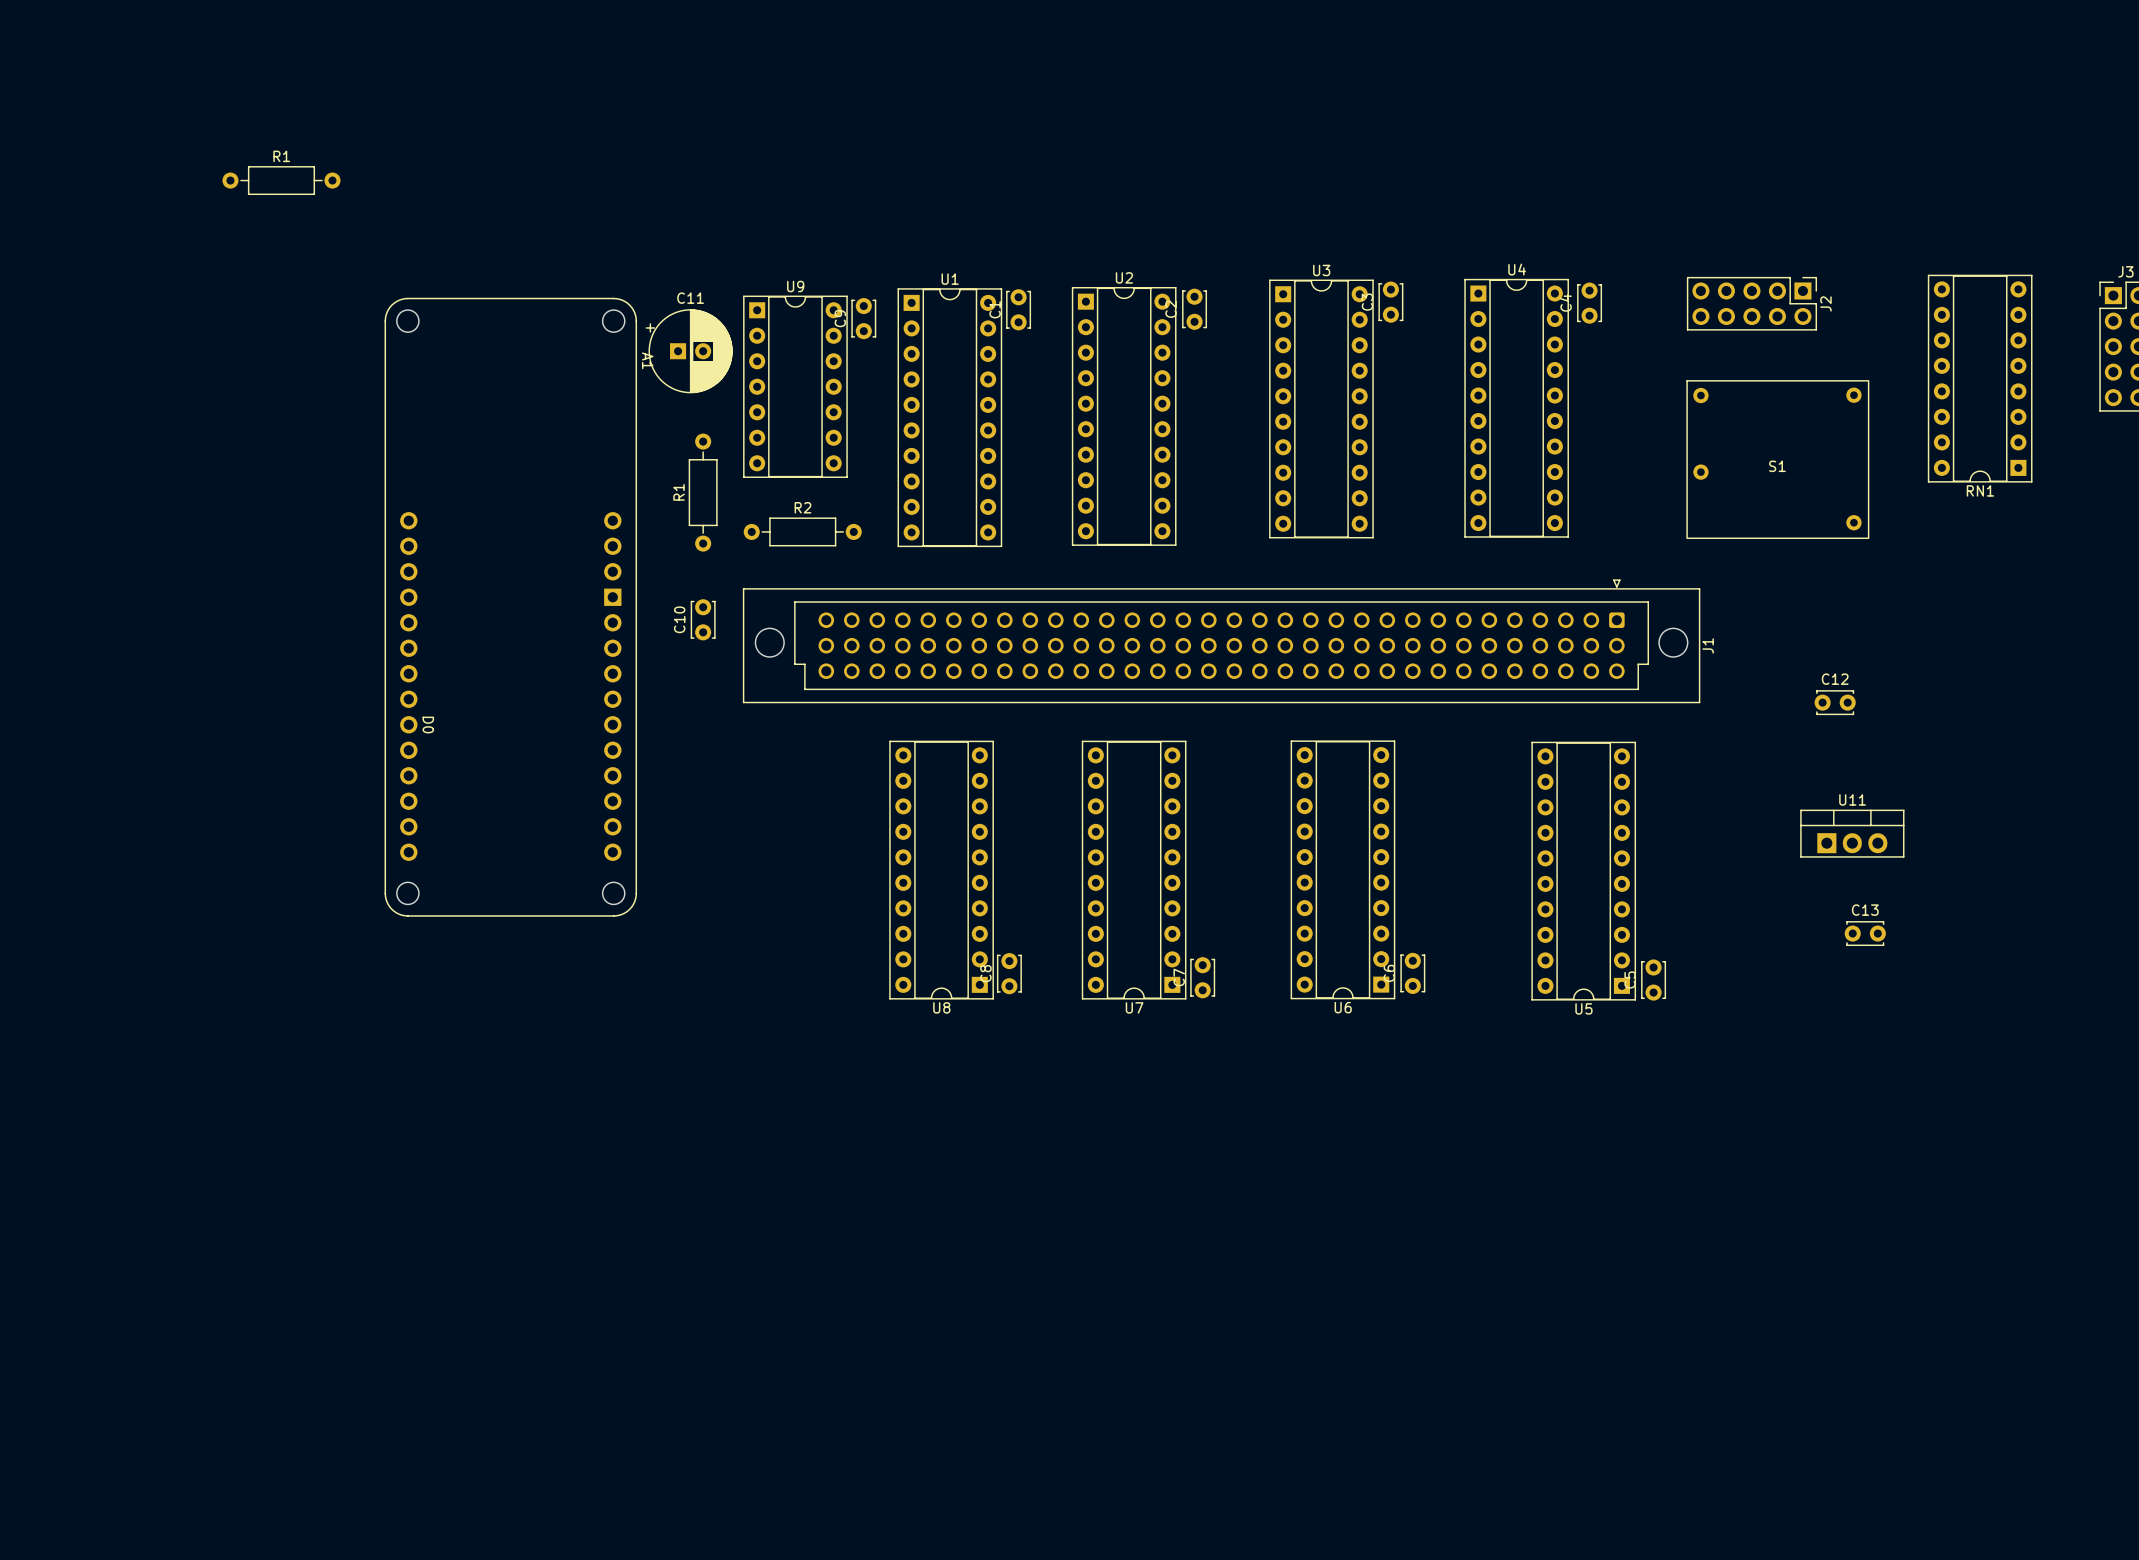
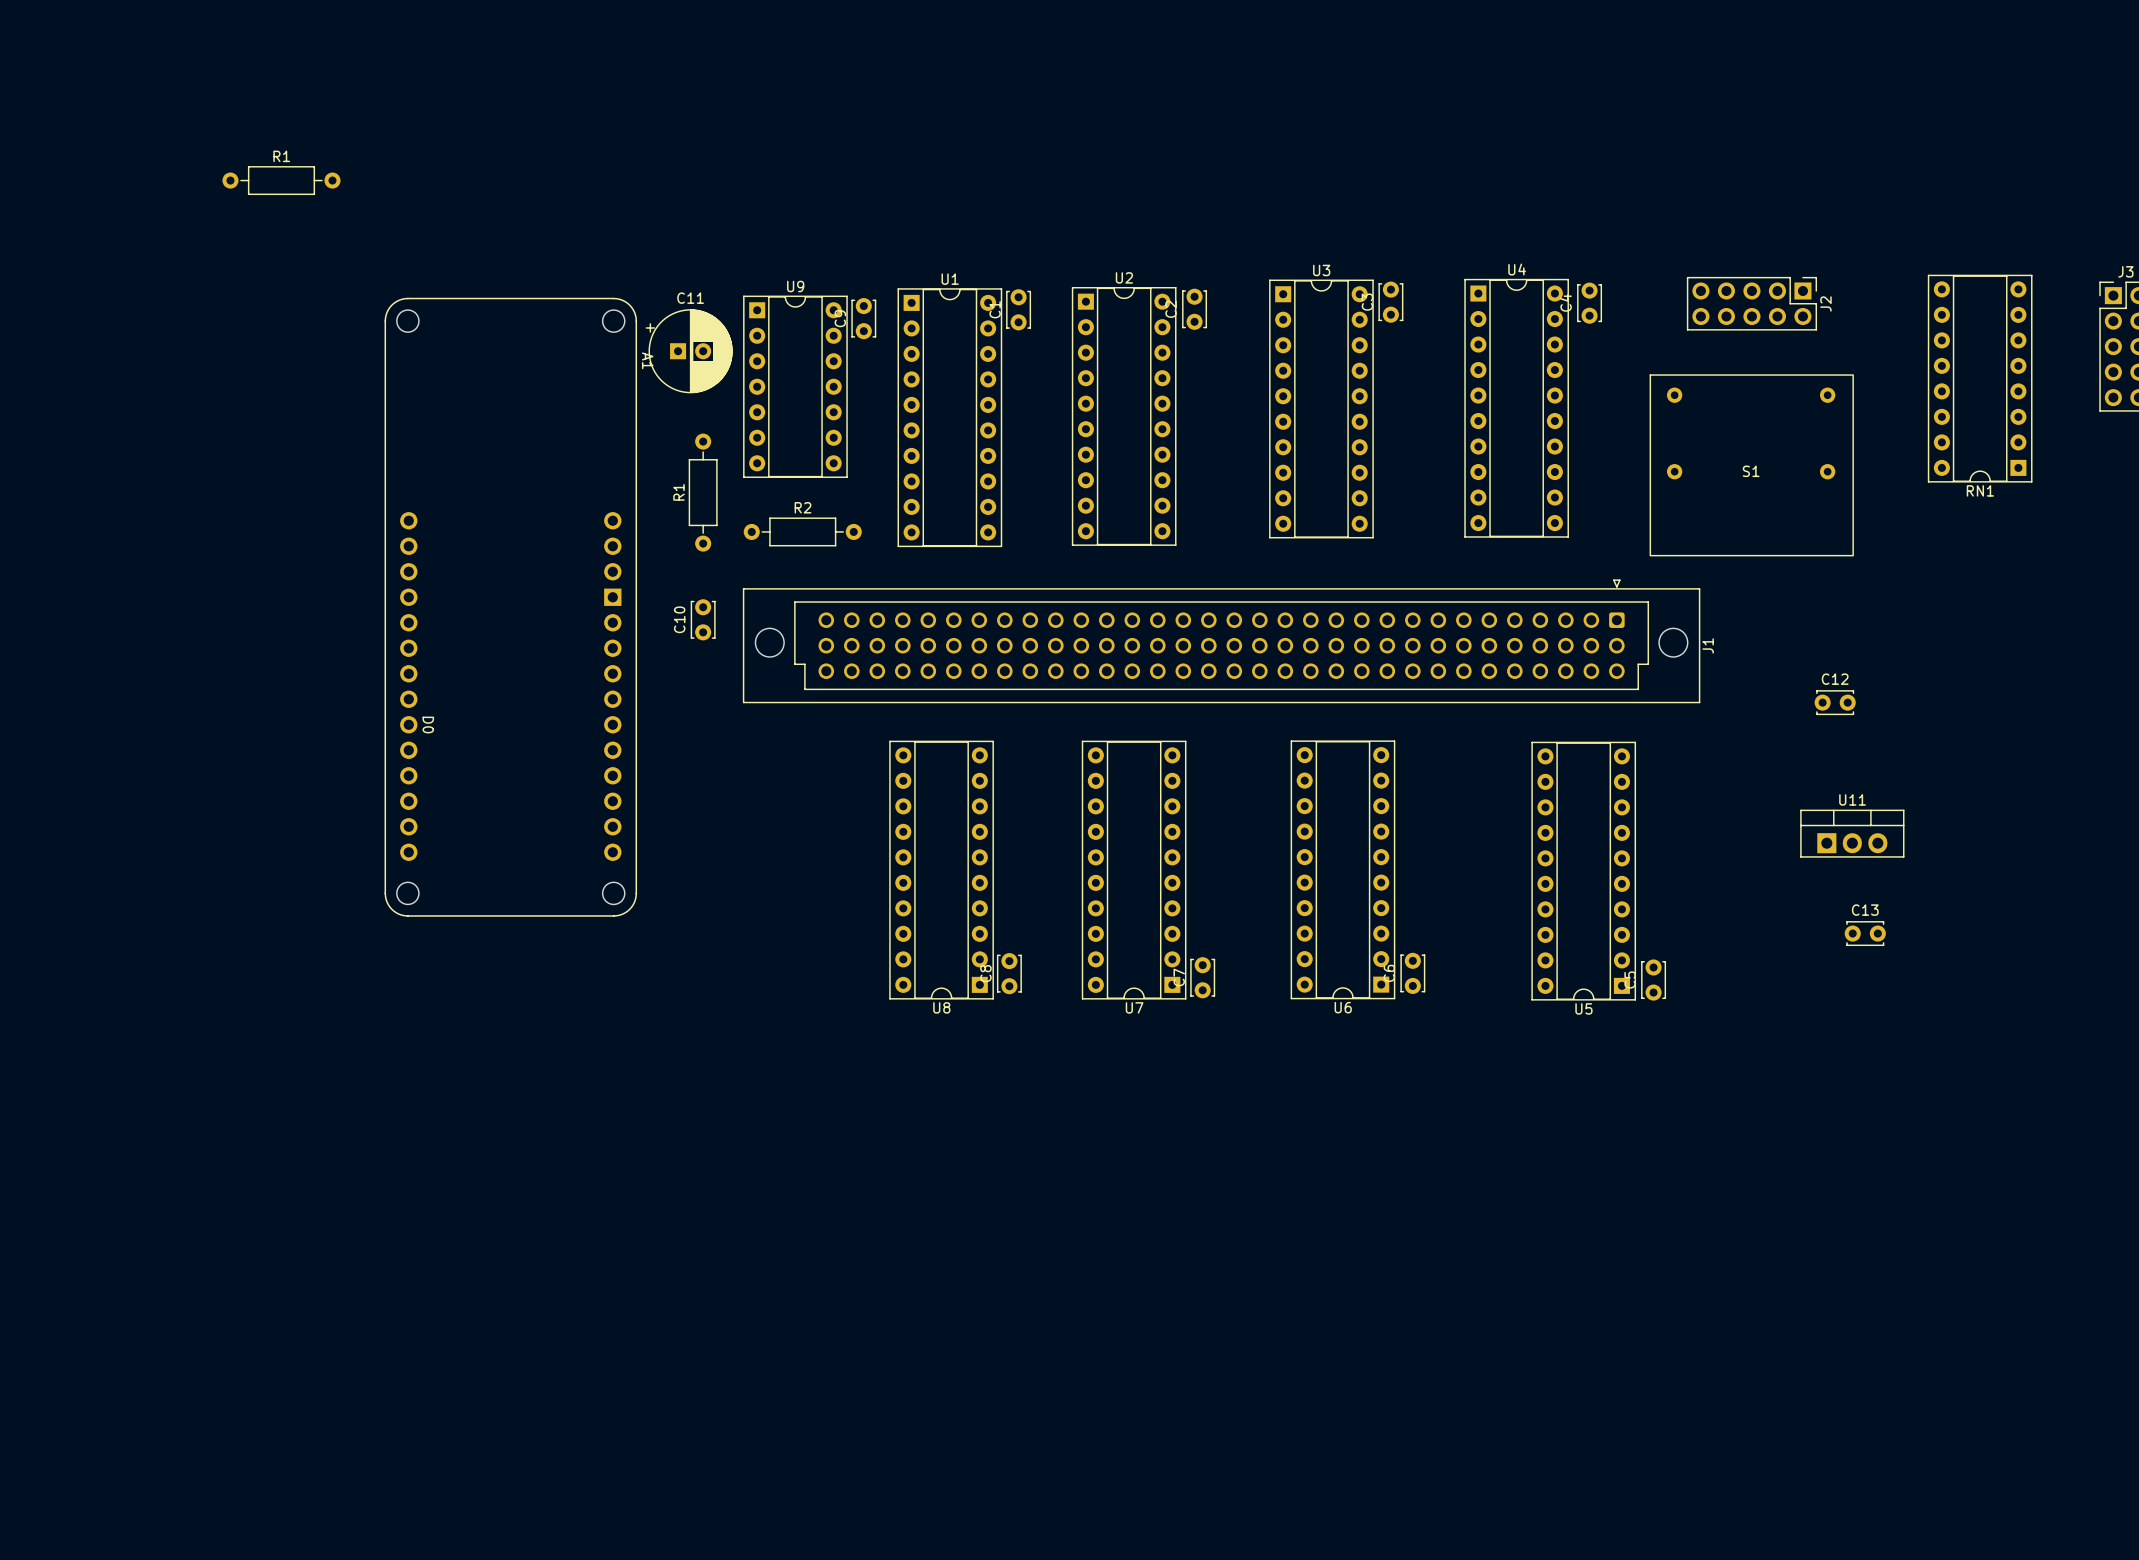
S1 footprint: [1686, 380, 1870, 539] -> [1649, 374, 1854, 557]

